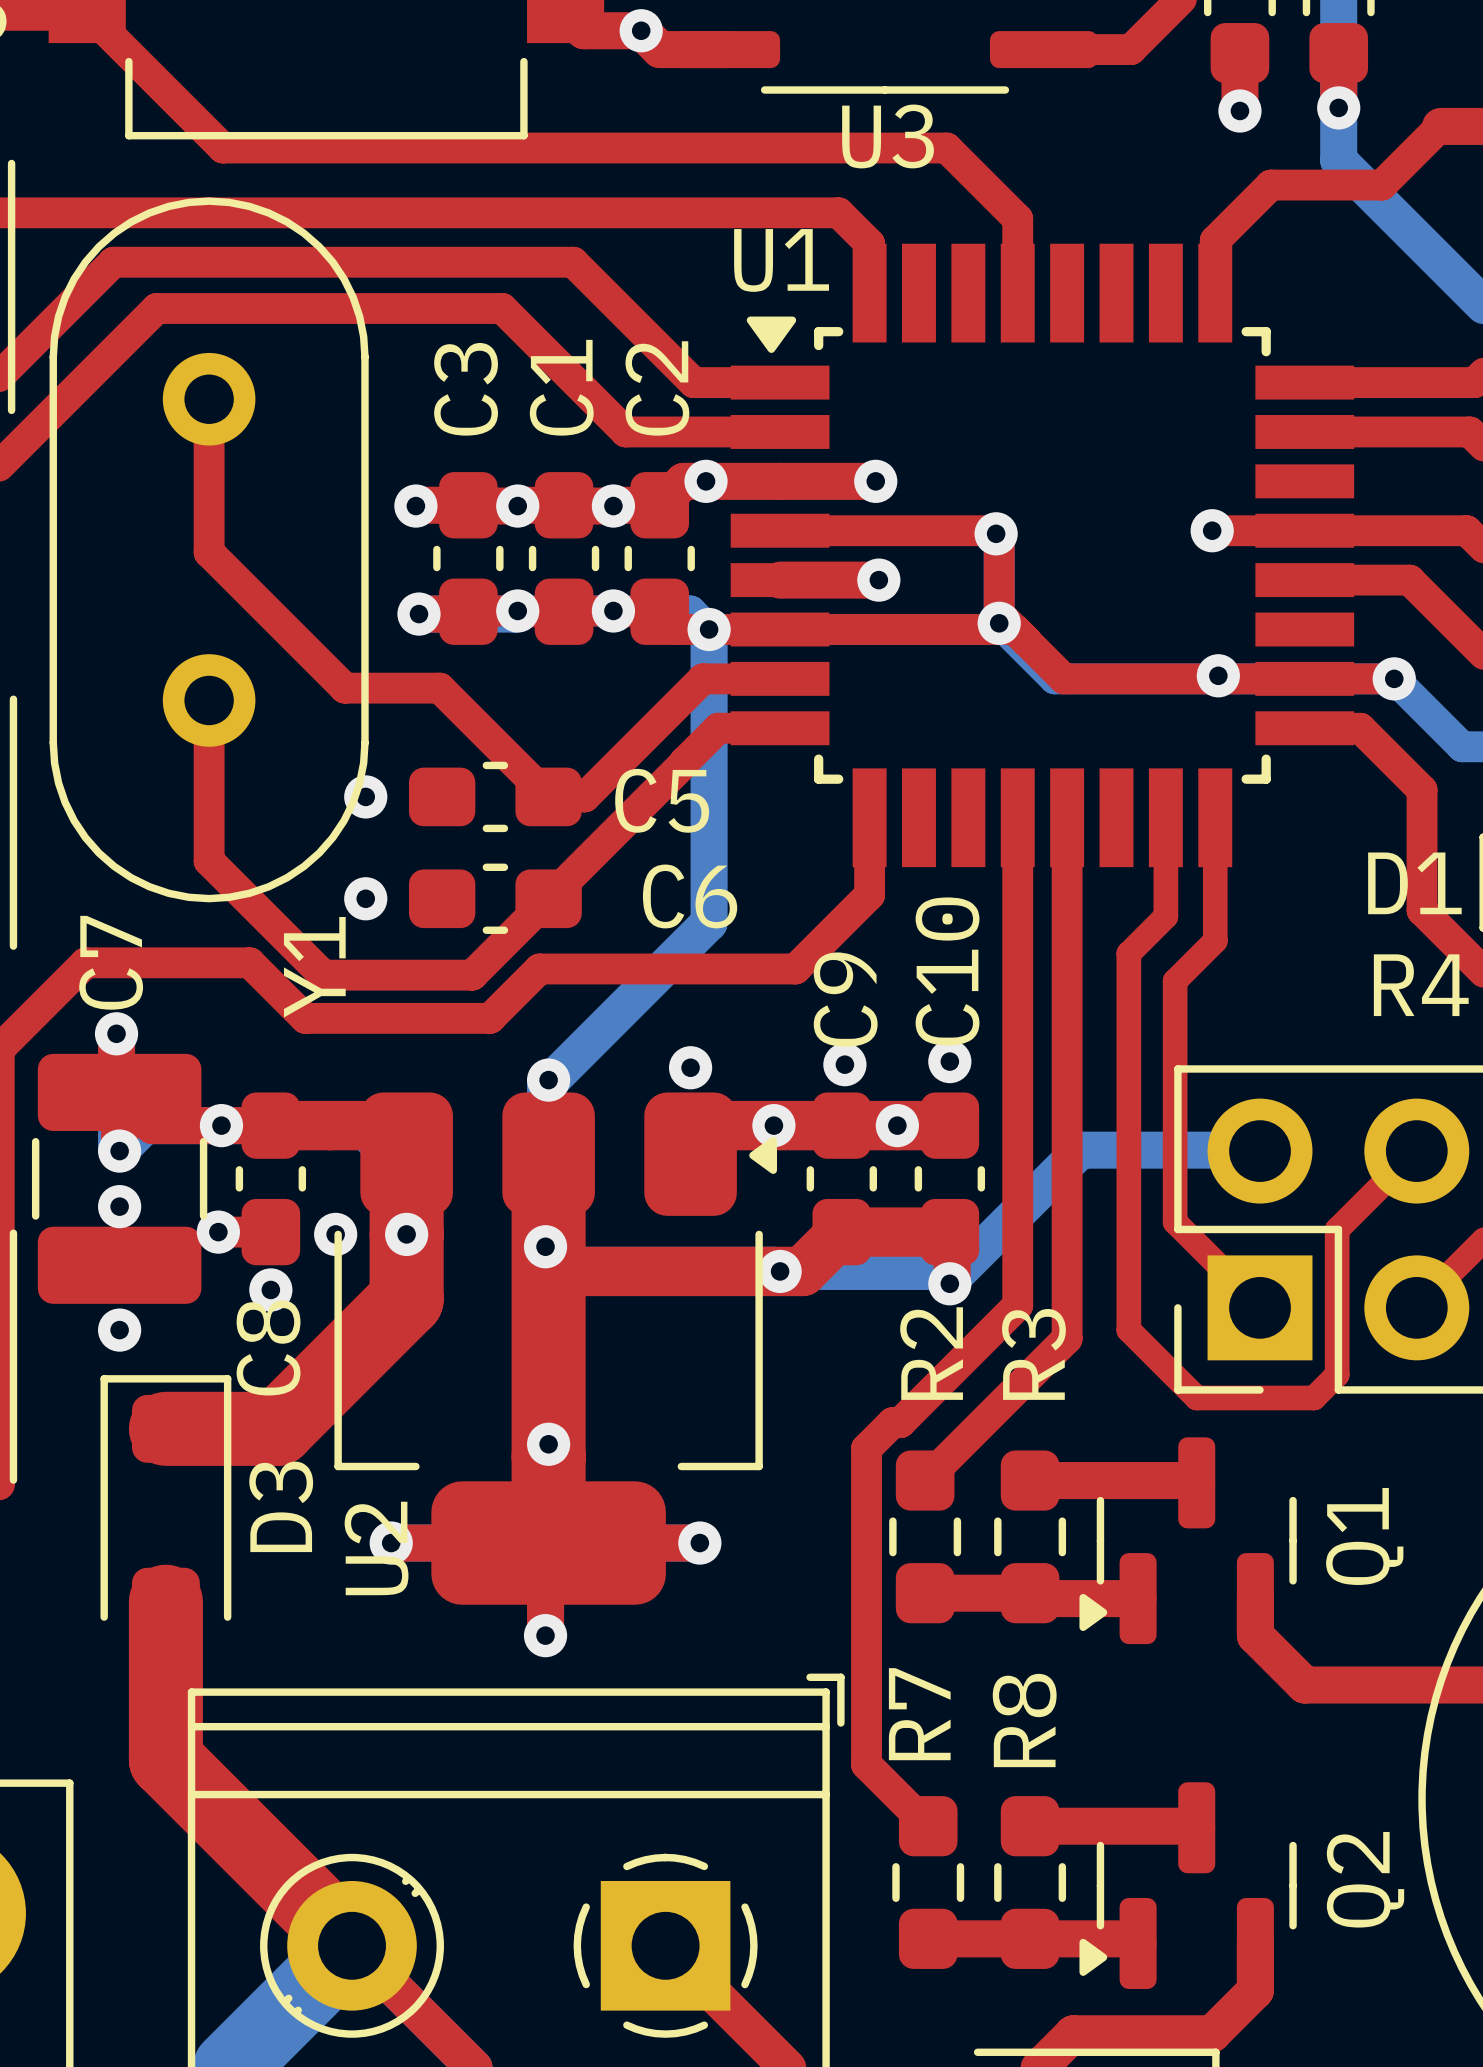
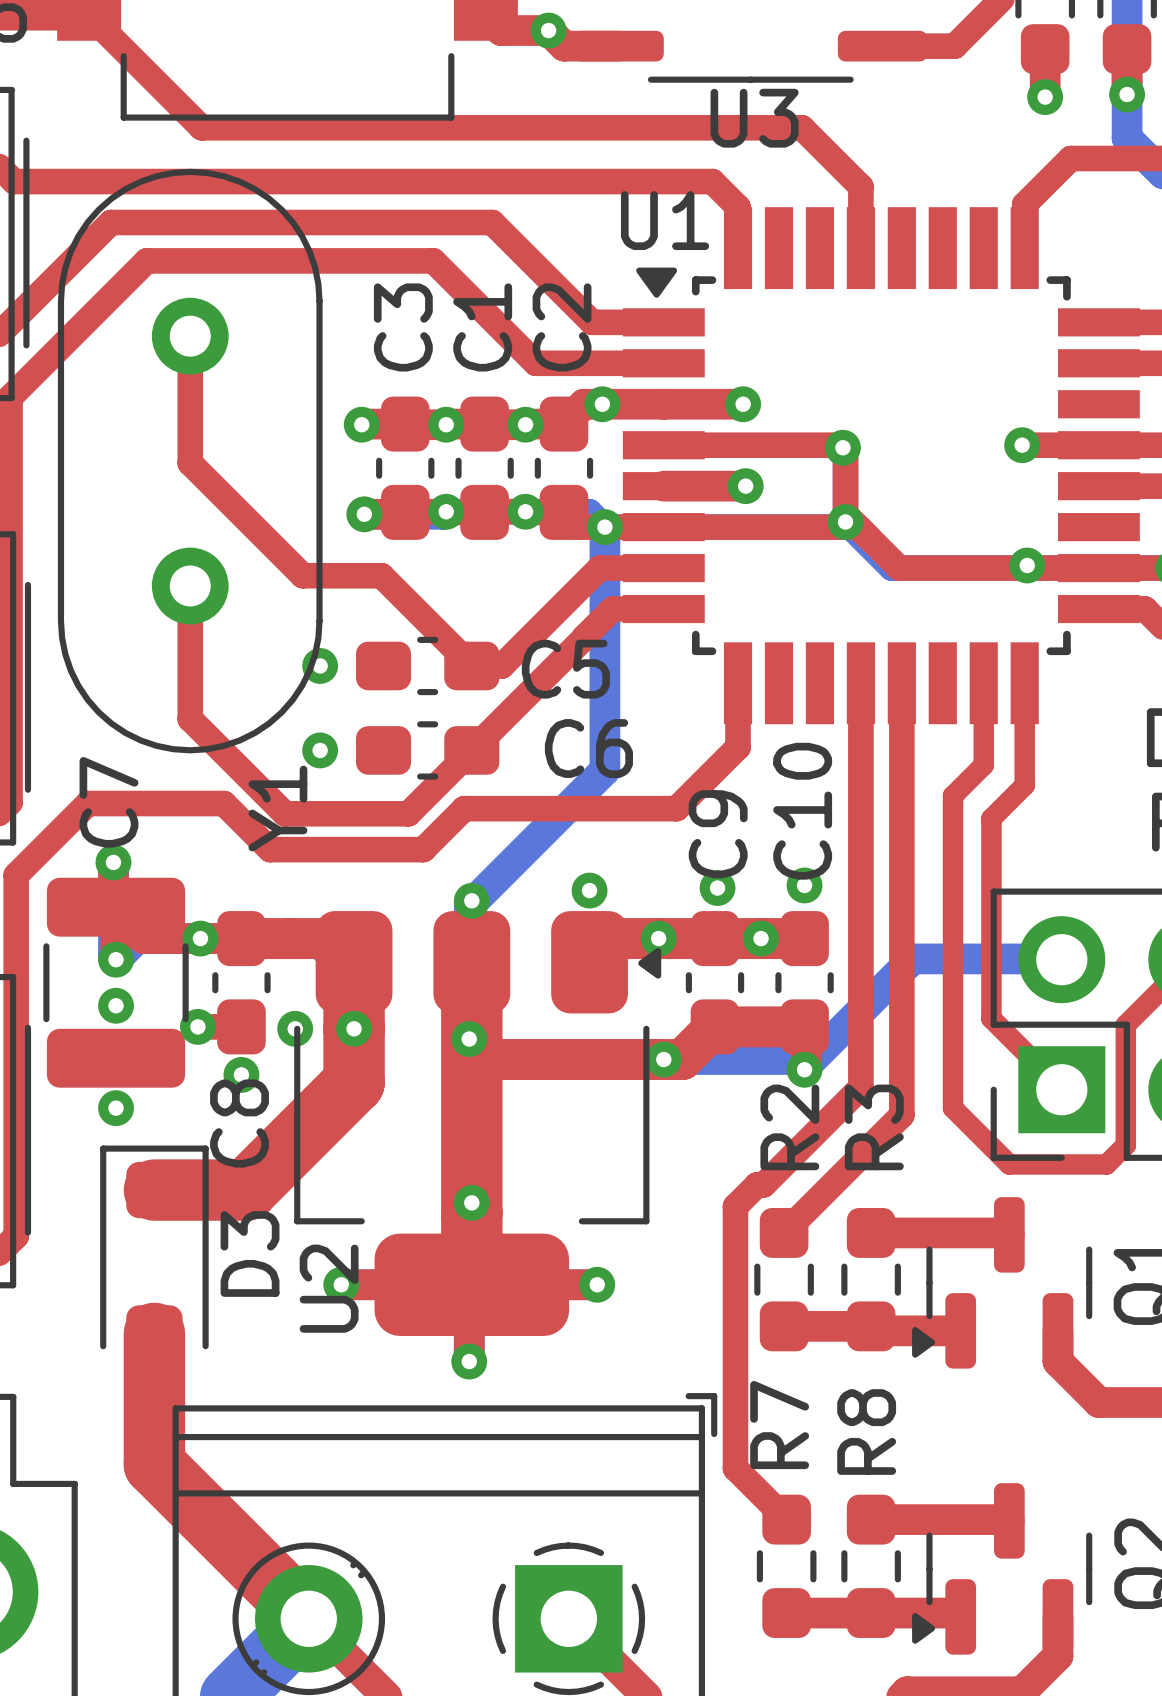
C7 footprint: [31, 1053, 208, 1304] -> [43, 877, 189, 1088]

